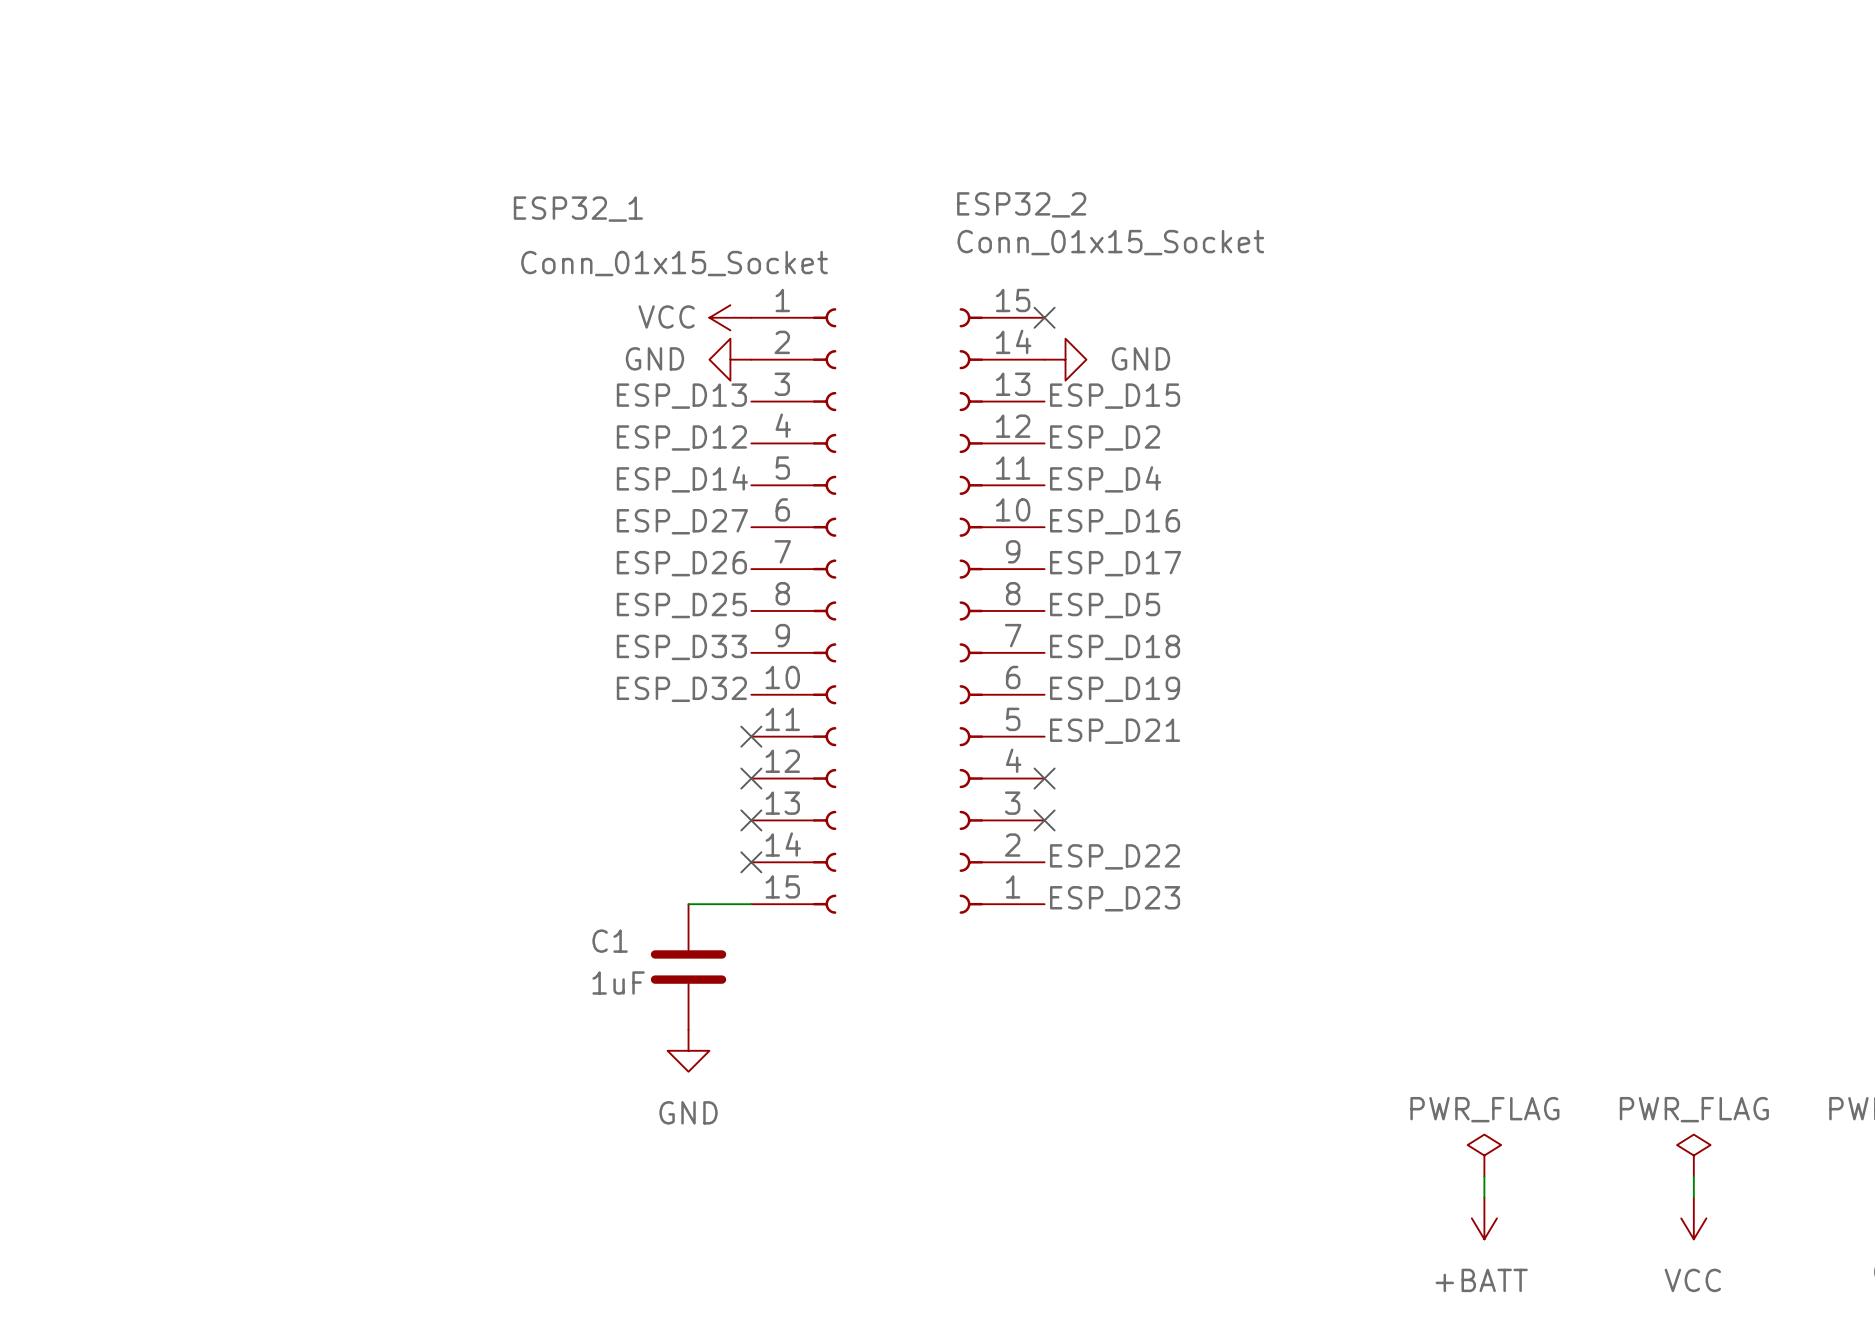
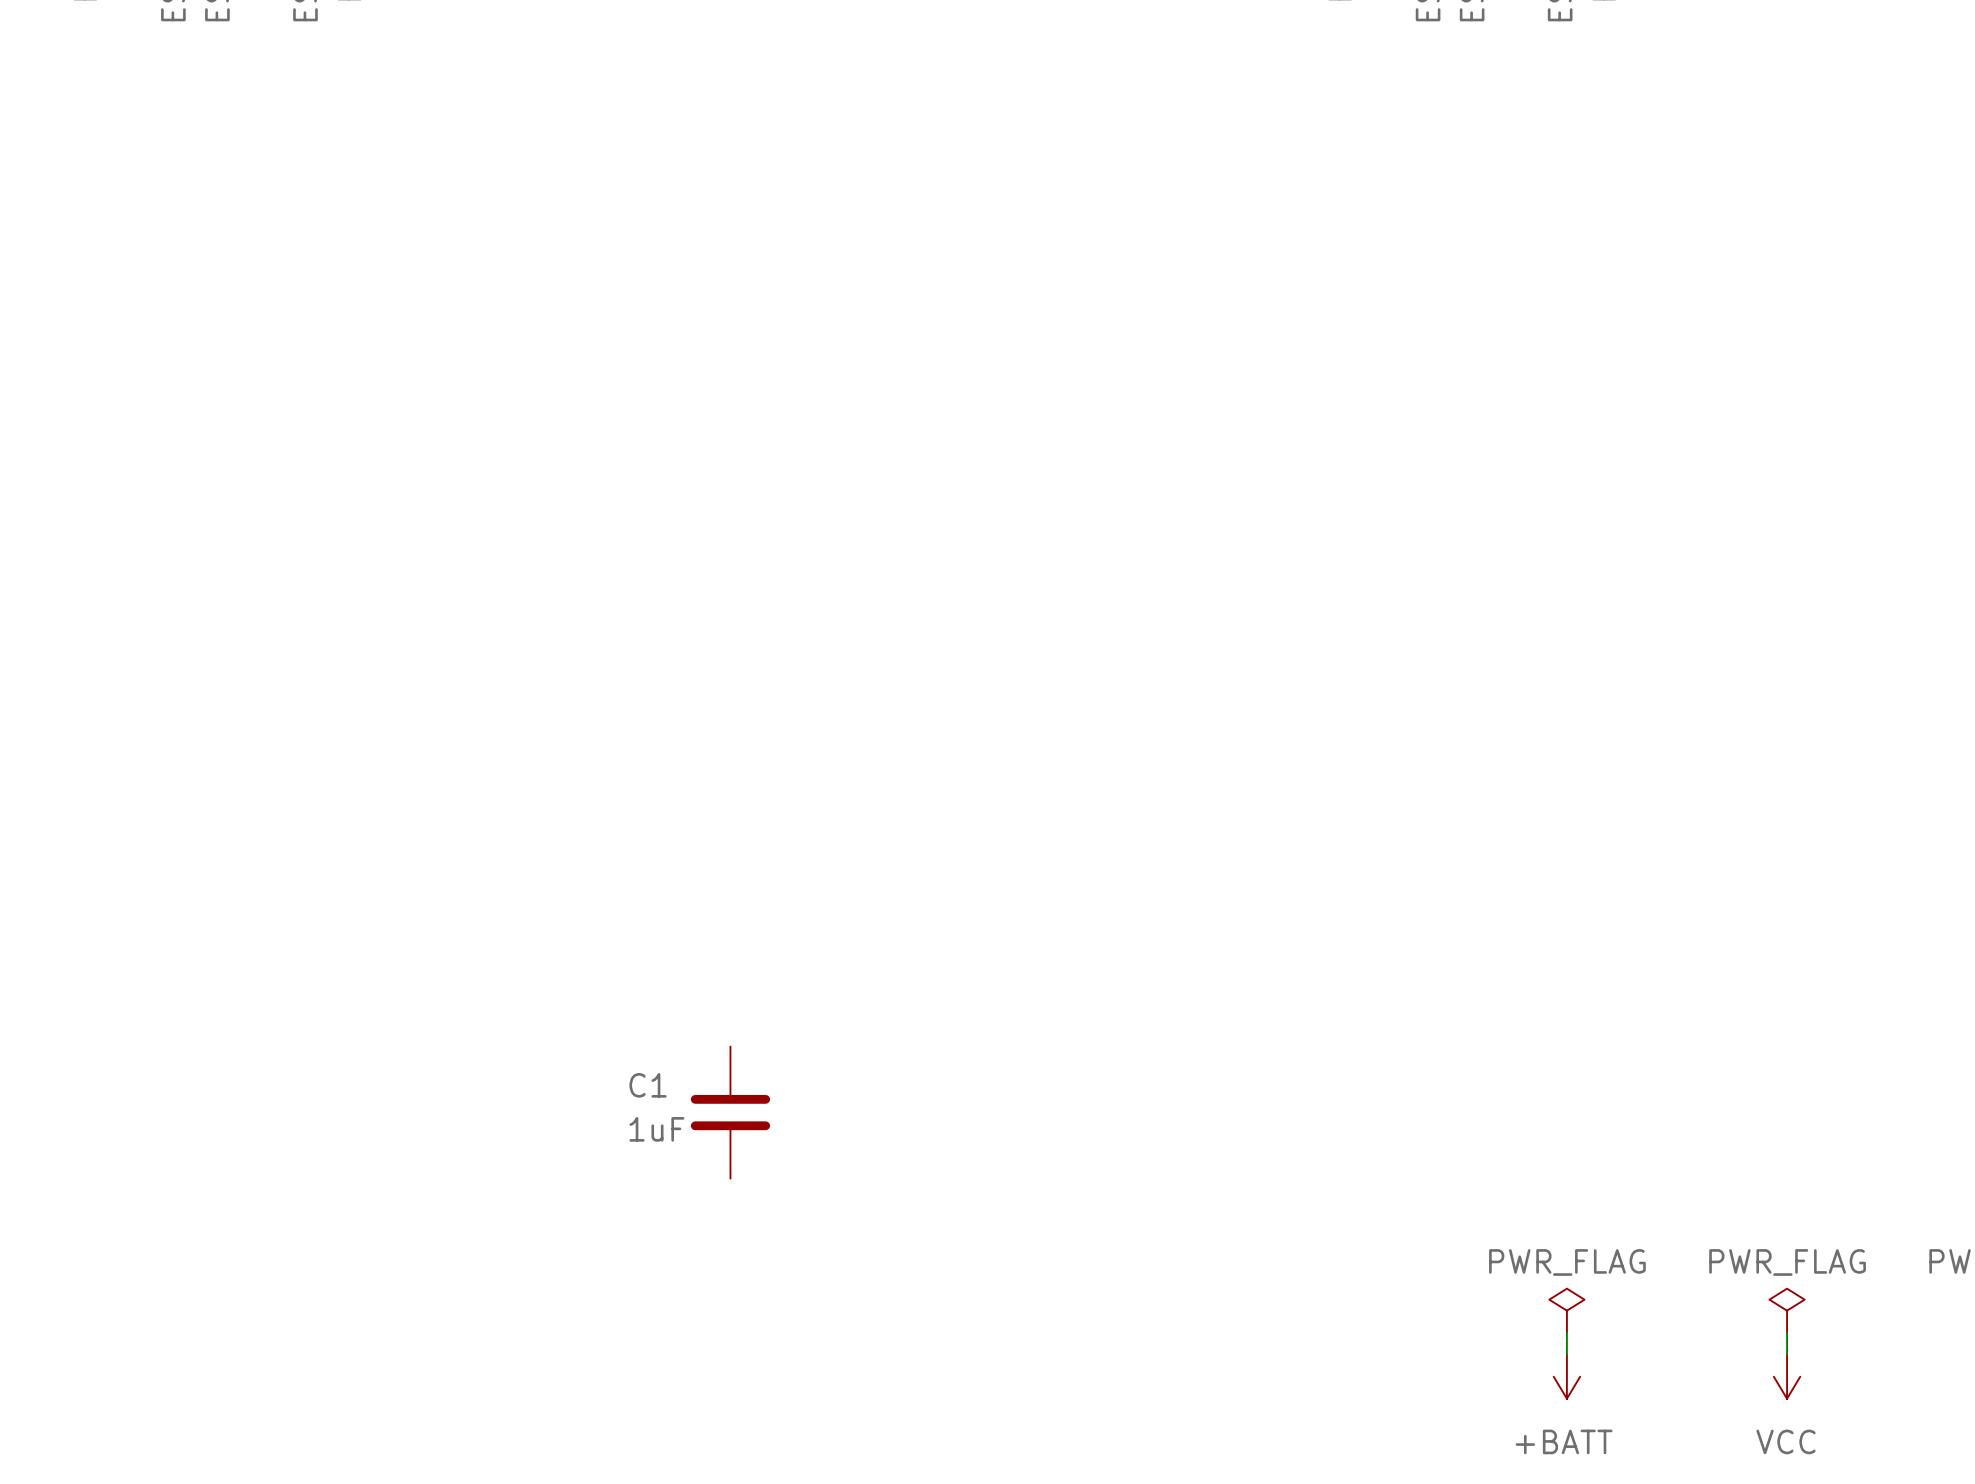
power symbol: VCC (730, 317) -> none
no-connect mark: (1044, 317) -> none
power symbol: GND (730, 359) -> none
power symbol: GND (1065, 359) -> none
label: ESP_D13 (681, 396) -> none
label: ESP_D15 (1115, 396) -> none
label: ESP_D12 (681, 437) -> none
label: ESP_D2 (1105, 437) -> none
label: ESP_D14 (682, 479) -> none
label: ESP_D4 (1105, 479) -> none
label: ESP_D27 (682, 521) -> none
label: ESP_D16 (1115, 521) -> none
label: ESP_D26 (681, 563) -> none
label: ESP_D17 (1115, 563) -> none
label: ESP_D25 (681, 605) -> none
label: ESP_D5 (1105, 605) -> none
ESP32_1: Conn_01x15_Socket (793, 610) -> none
ESP32_2: Conn_01x15_Socket (1002, 610) -> none
label: ESP_D33 (681, 647) -> none
label: ESP_D18 (1115, 647) -> none
label: ESP_D32 (681, 689) -> none
label: ESP_D19 (1115, 689) -> none
label: ESP_D21 (1115, 731) -> none
no-connect mark: (751, 736) -> none
no-connect mark: (751, 778) -> none
no-connect mark: (1044, 778) -> none
no-connect mark: (751, 820) -> none
no-connect mark: (1044, 820) -> none
label: ESP_D22 (1115, 856) -> none
no-connect mark: (751, 862) -> none
label: ESP_D23 (1115, 898) -> none
wire: (688, 904) (751, 904) -> none
power symbol: GND (688, 1050) -> none

